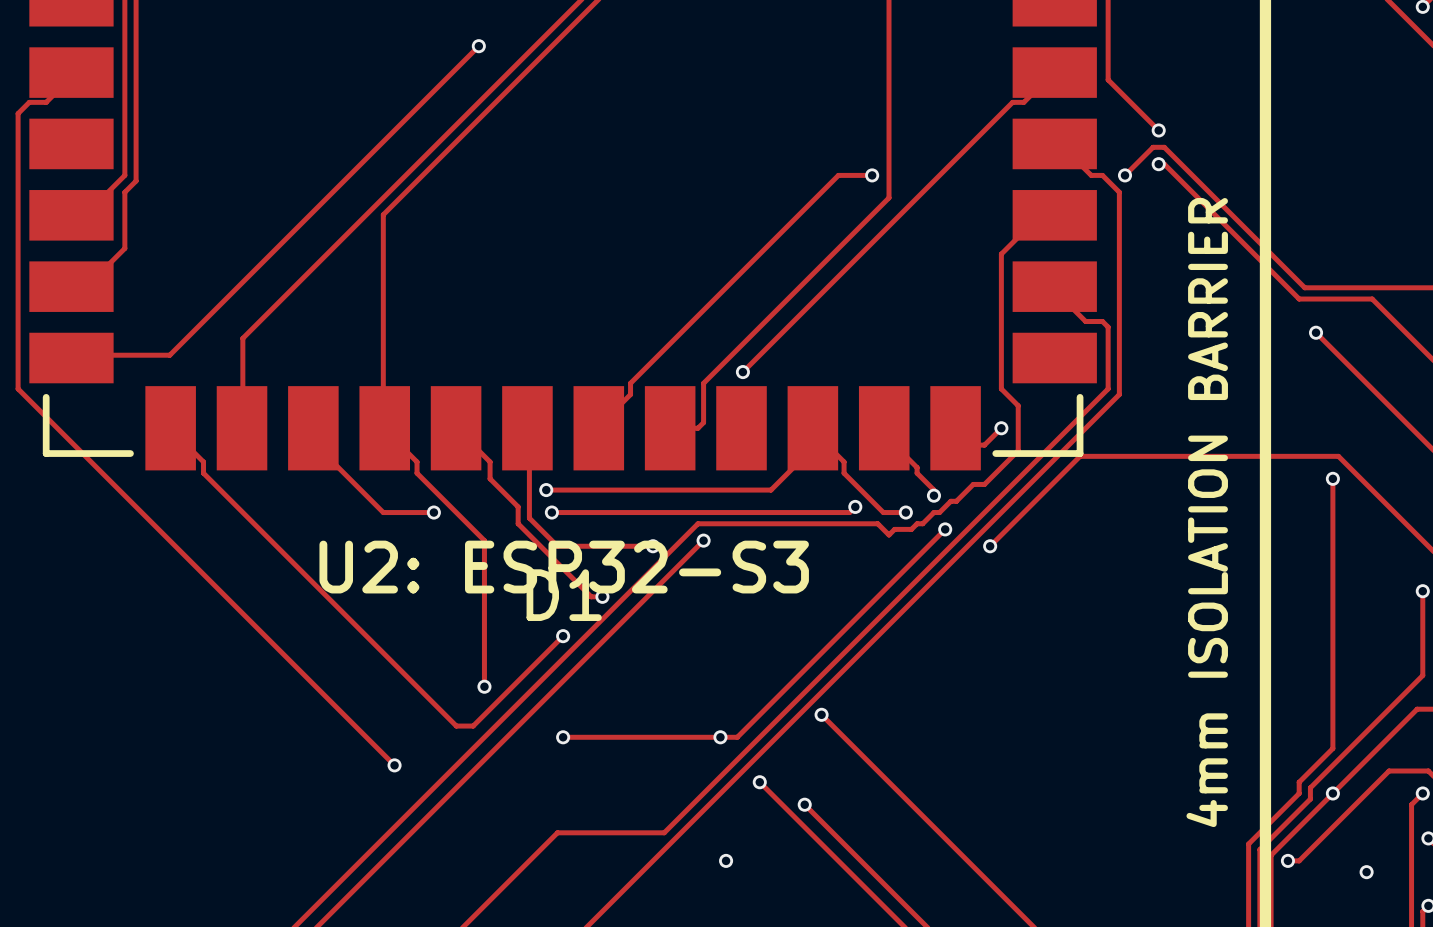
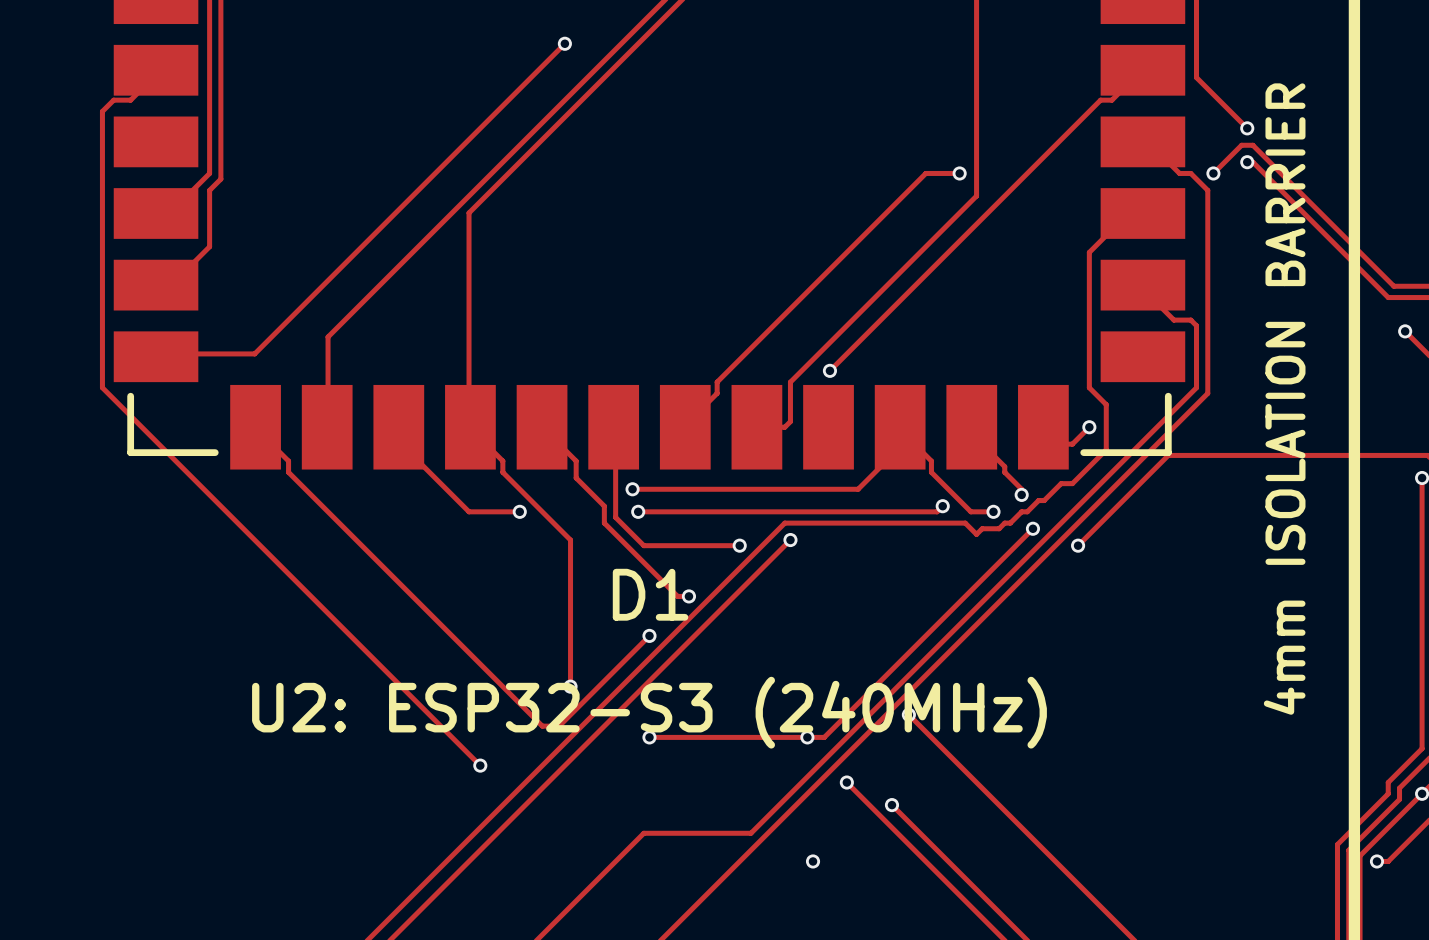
text position: 4mm ISOLATION BARRIER (1207, 512) -> 4mm ISOLATION BARRIER (1284, 399)
text: U2: ESP32-S3 (564, 567) -> none
text: none -> U2: ESP32-S3 (240MHz) (649, 712)

